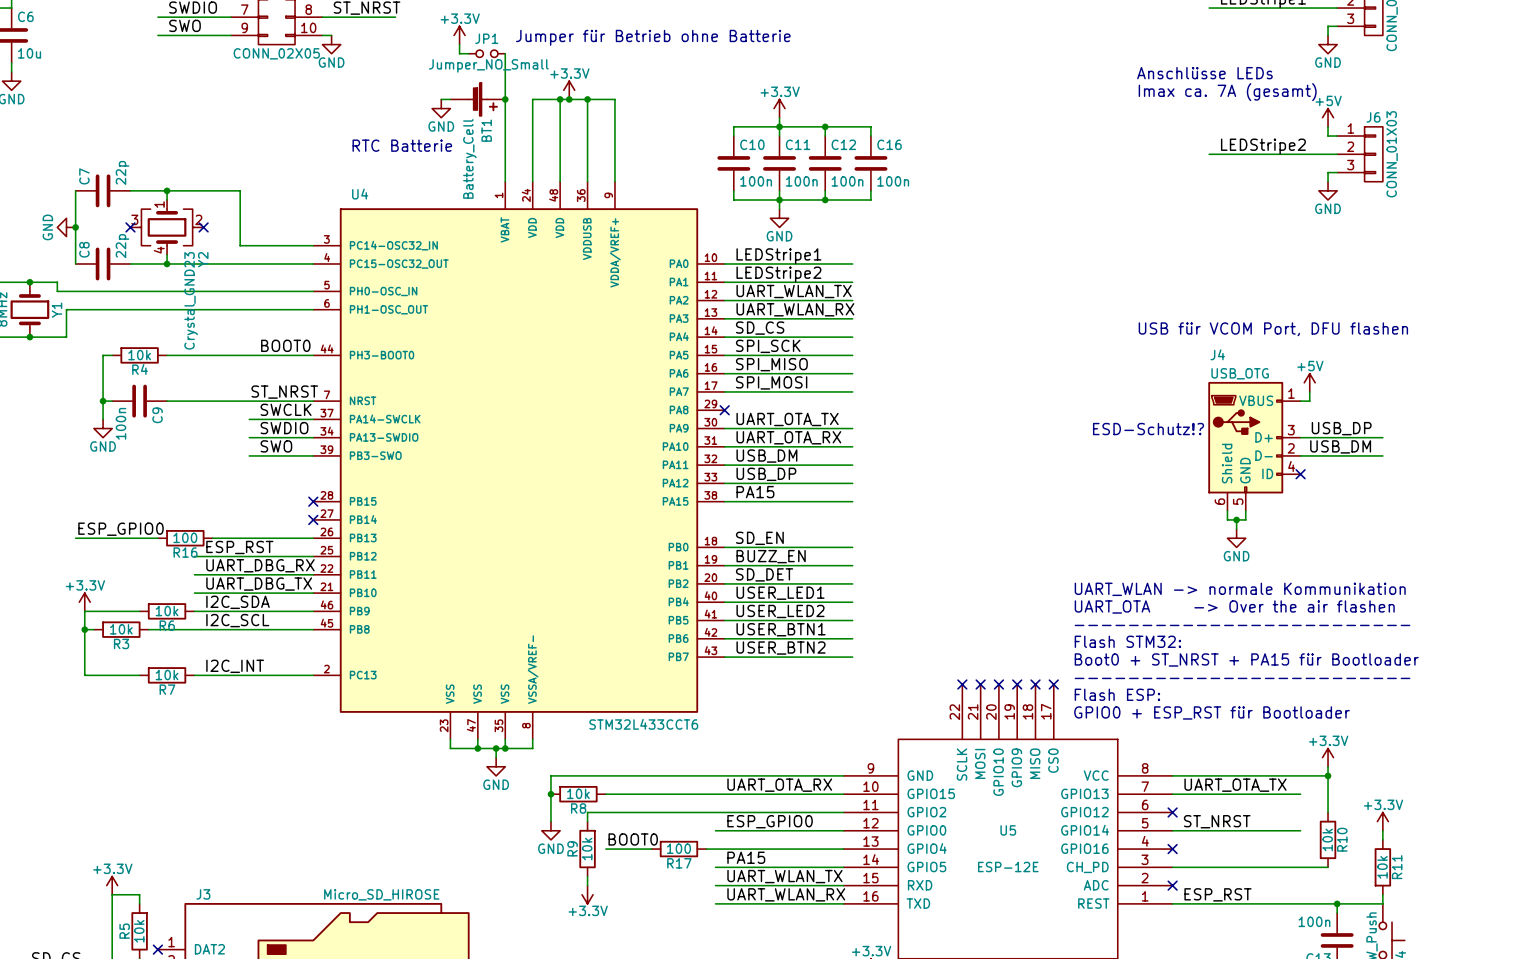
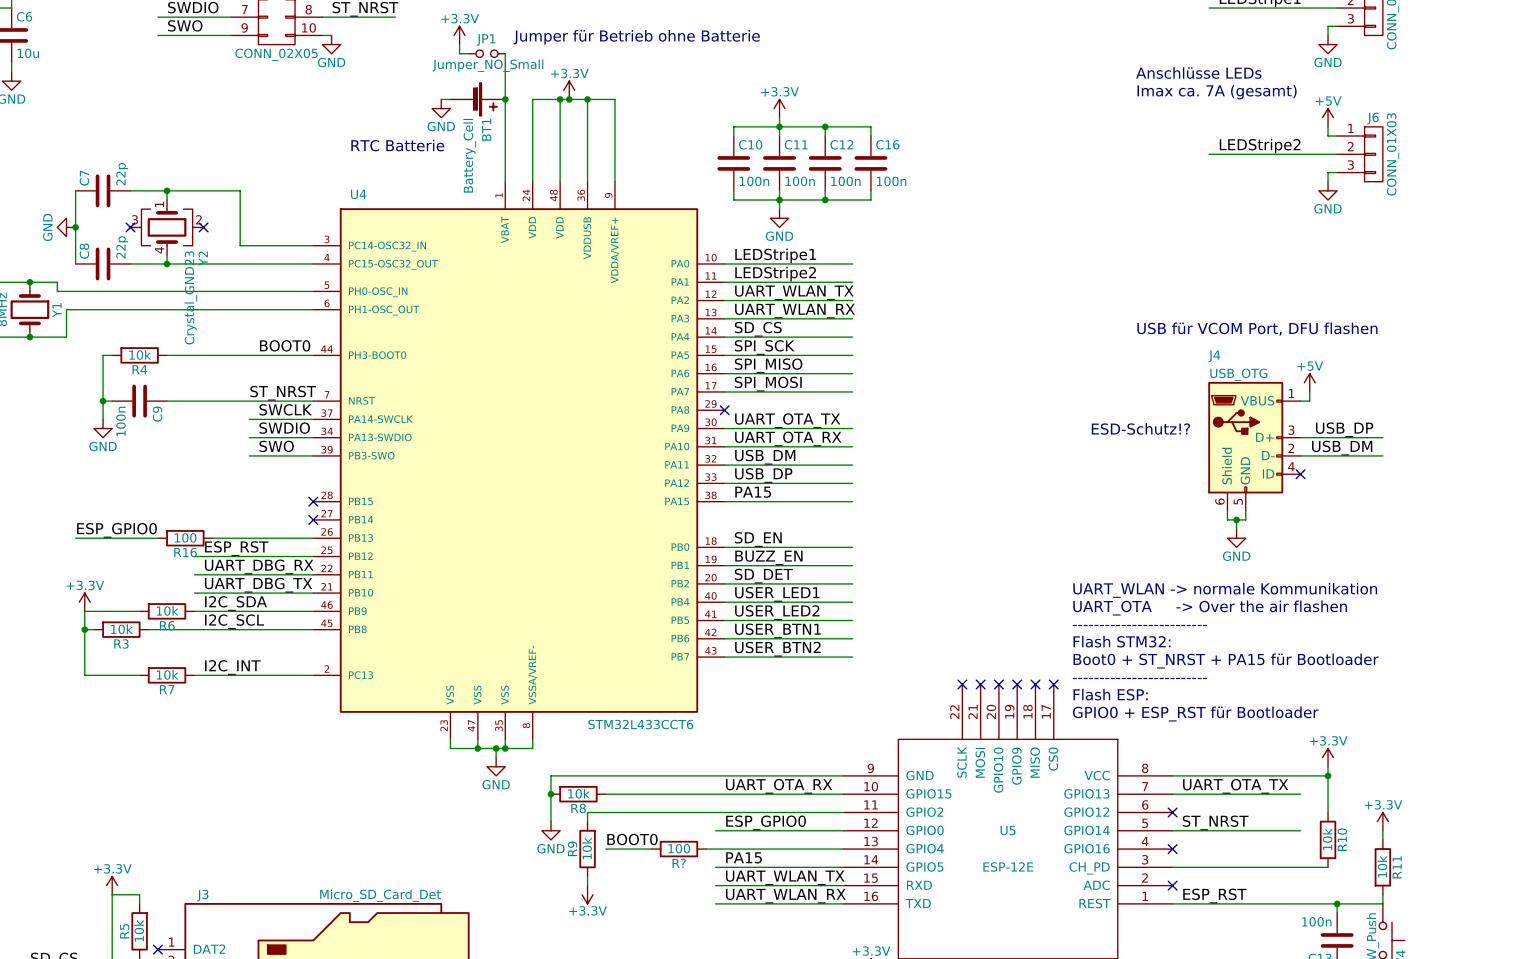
R17 name: R17 (679, 863) -> R? (679, 863)
J3 value: Micro_SD_HIROSE (381, 894) -> Micro_SD_Card_Det (380, 895)

